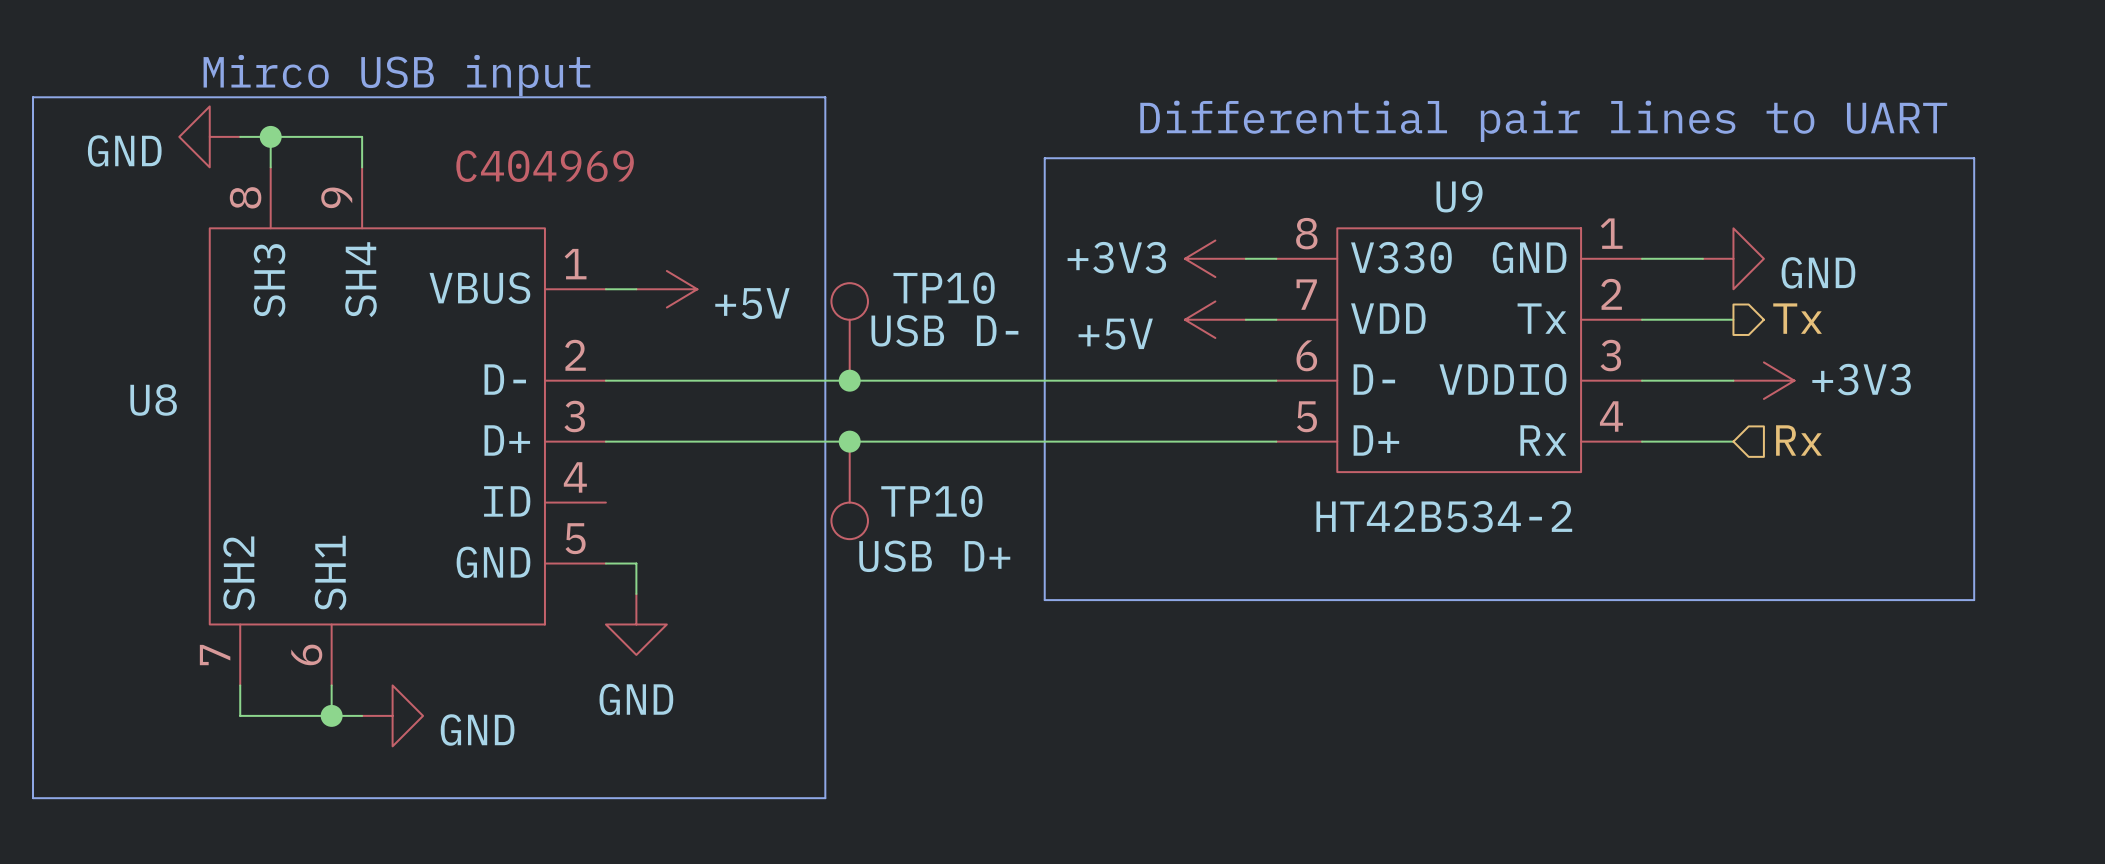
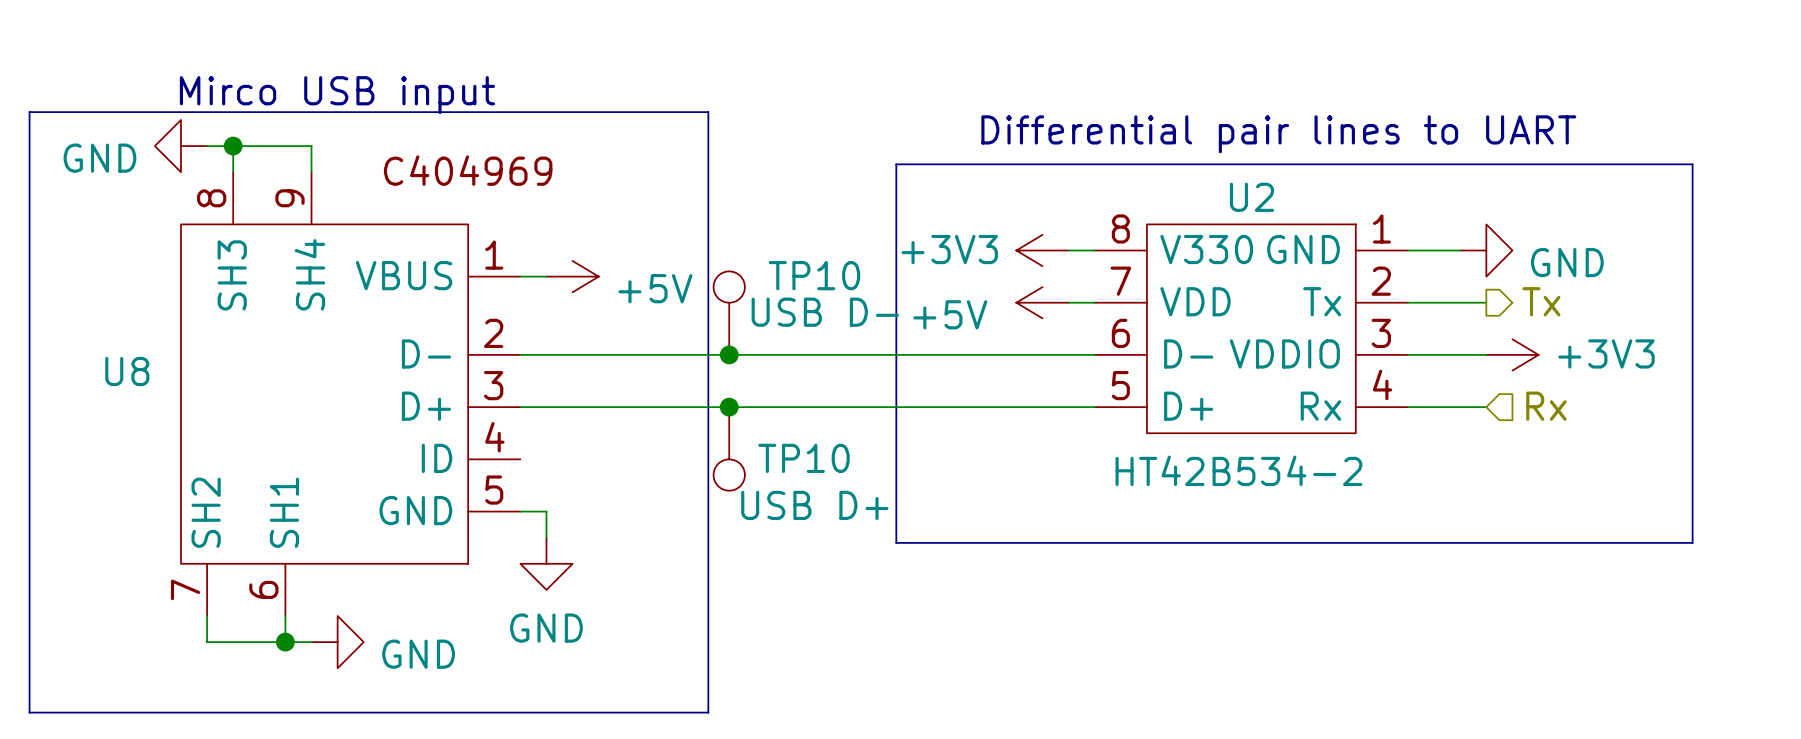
U9 name: U9 (1459, 196) -> U2 (1252, 197)

